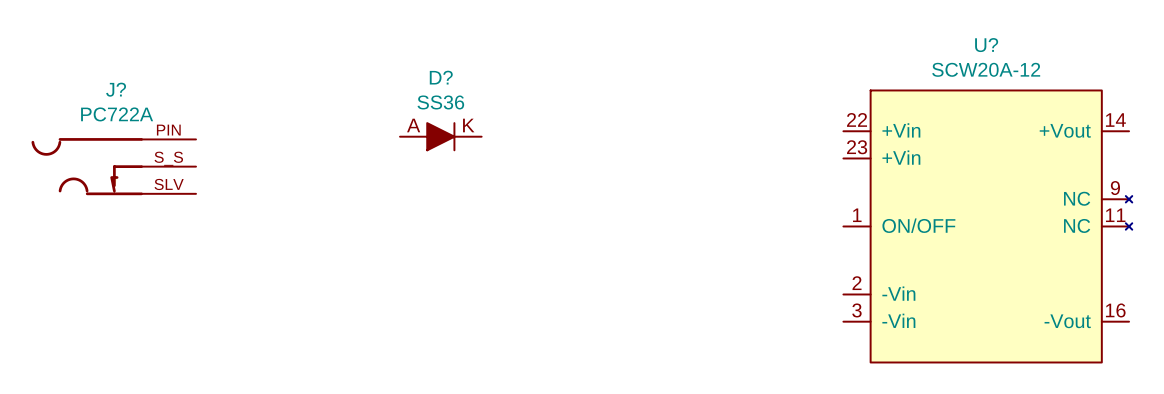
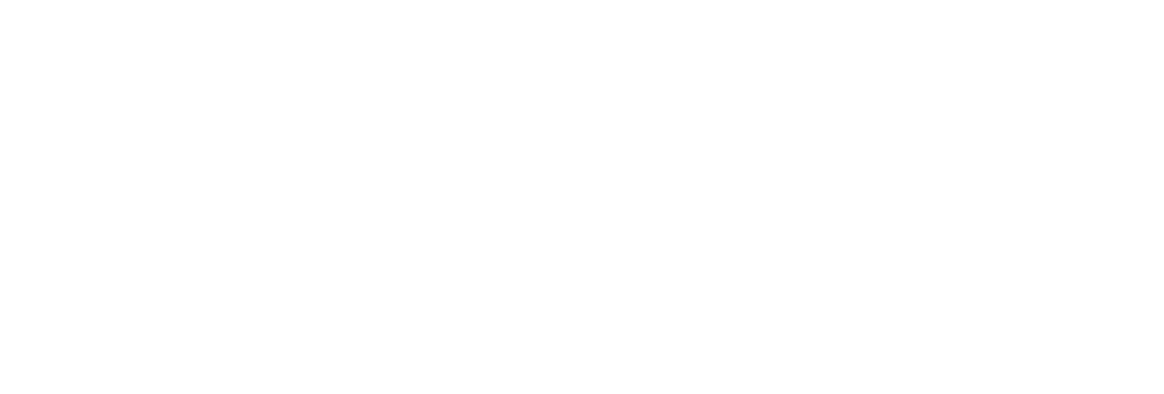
D?: SS36 (440, 136) -> none
J?: PC722A (113, 166) -> none
U?: SCW20A-12 (987, 226) -> none

